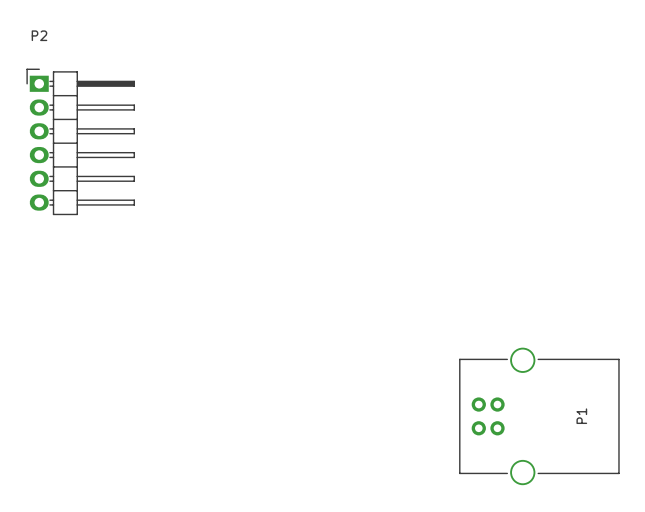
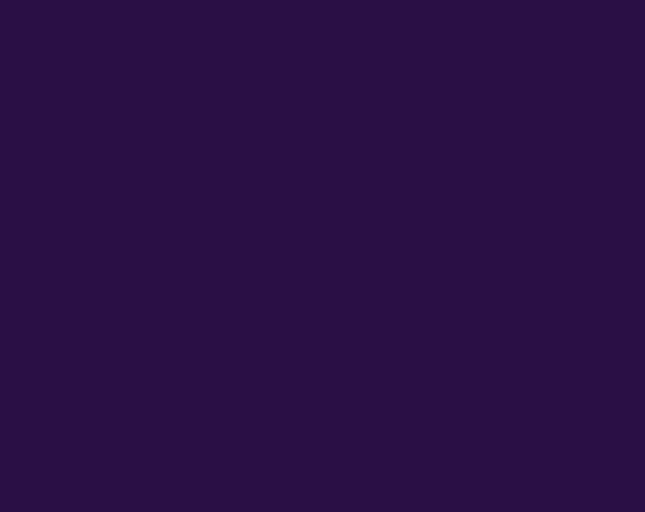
P2: (80, 141) -> none
P1: (539, 416) -> none

